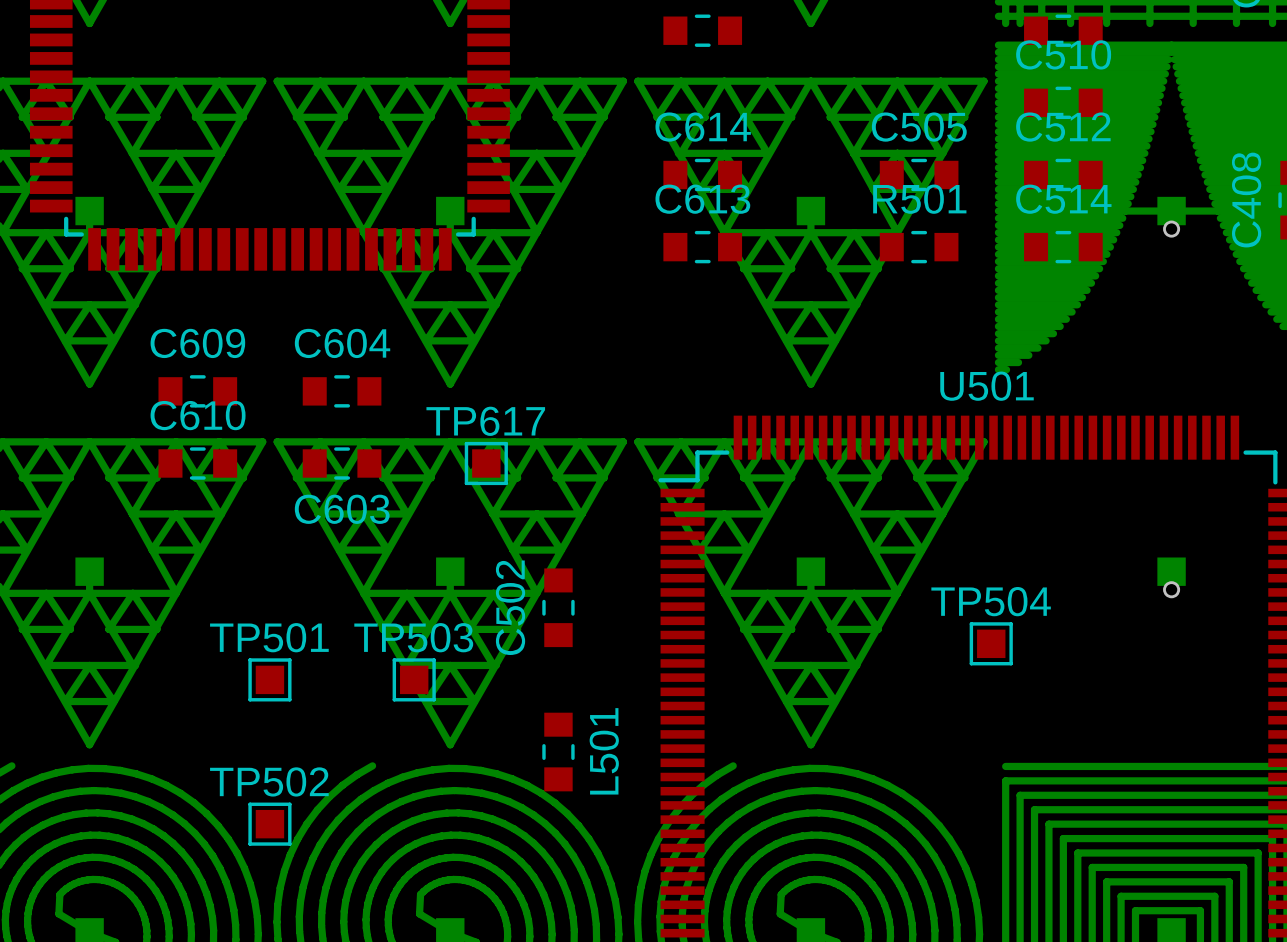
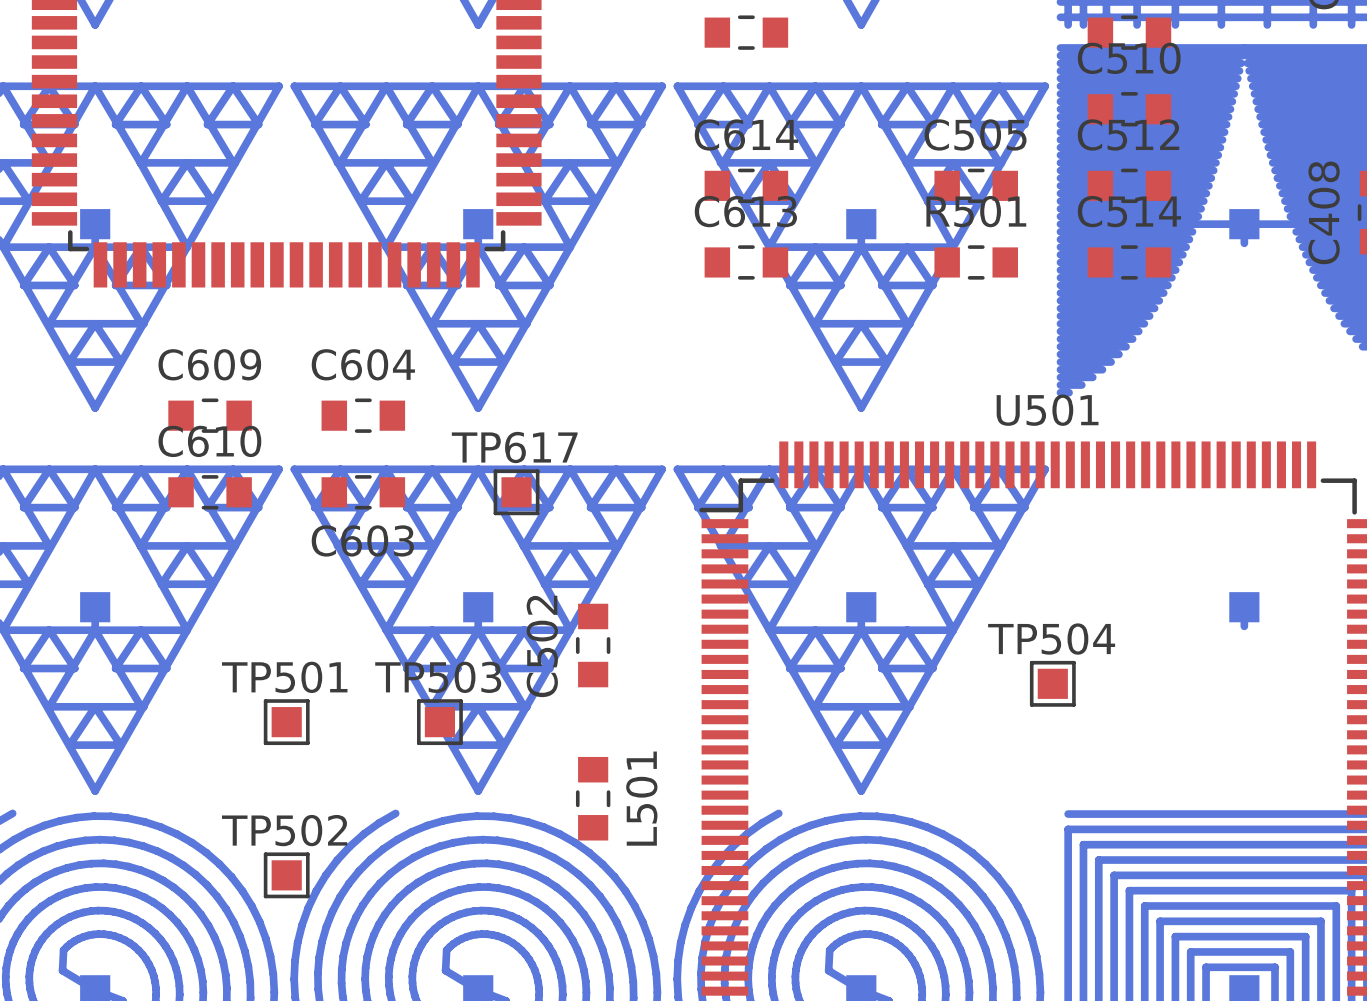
via: (1171, 229) -> none
via: (1171, 589) -> none

